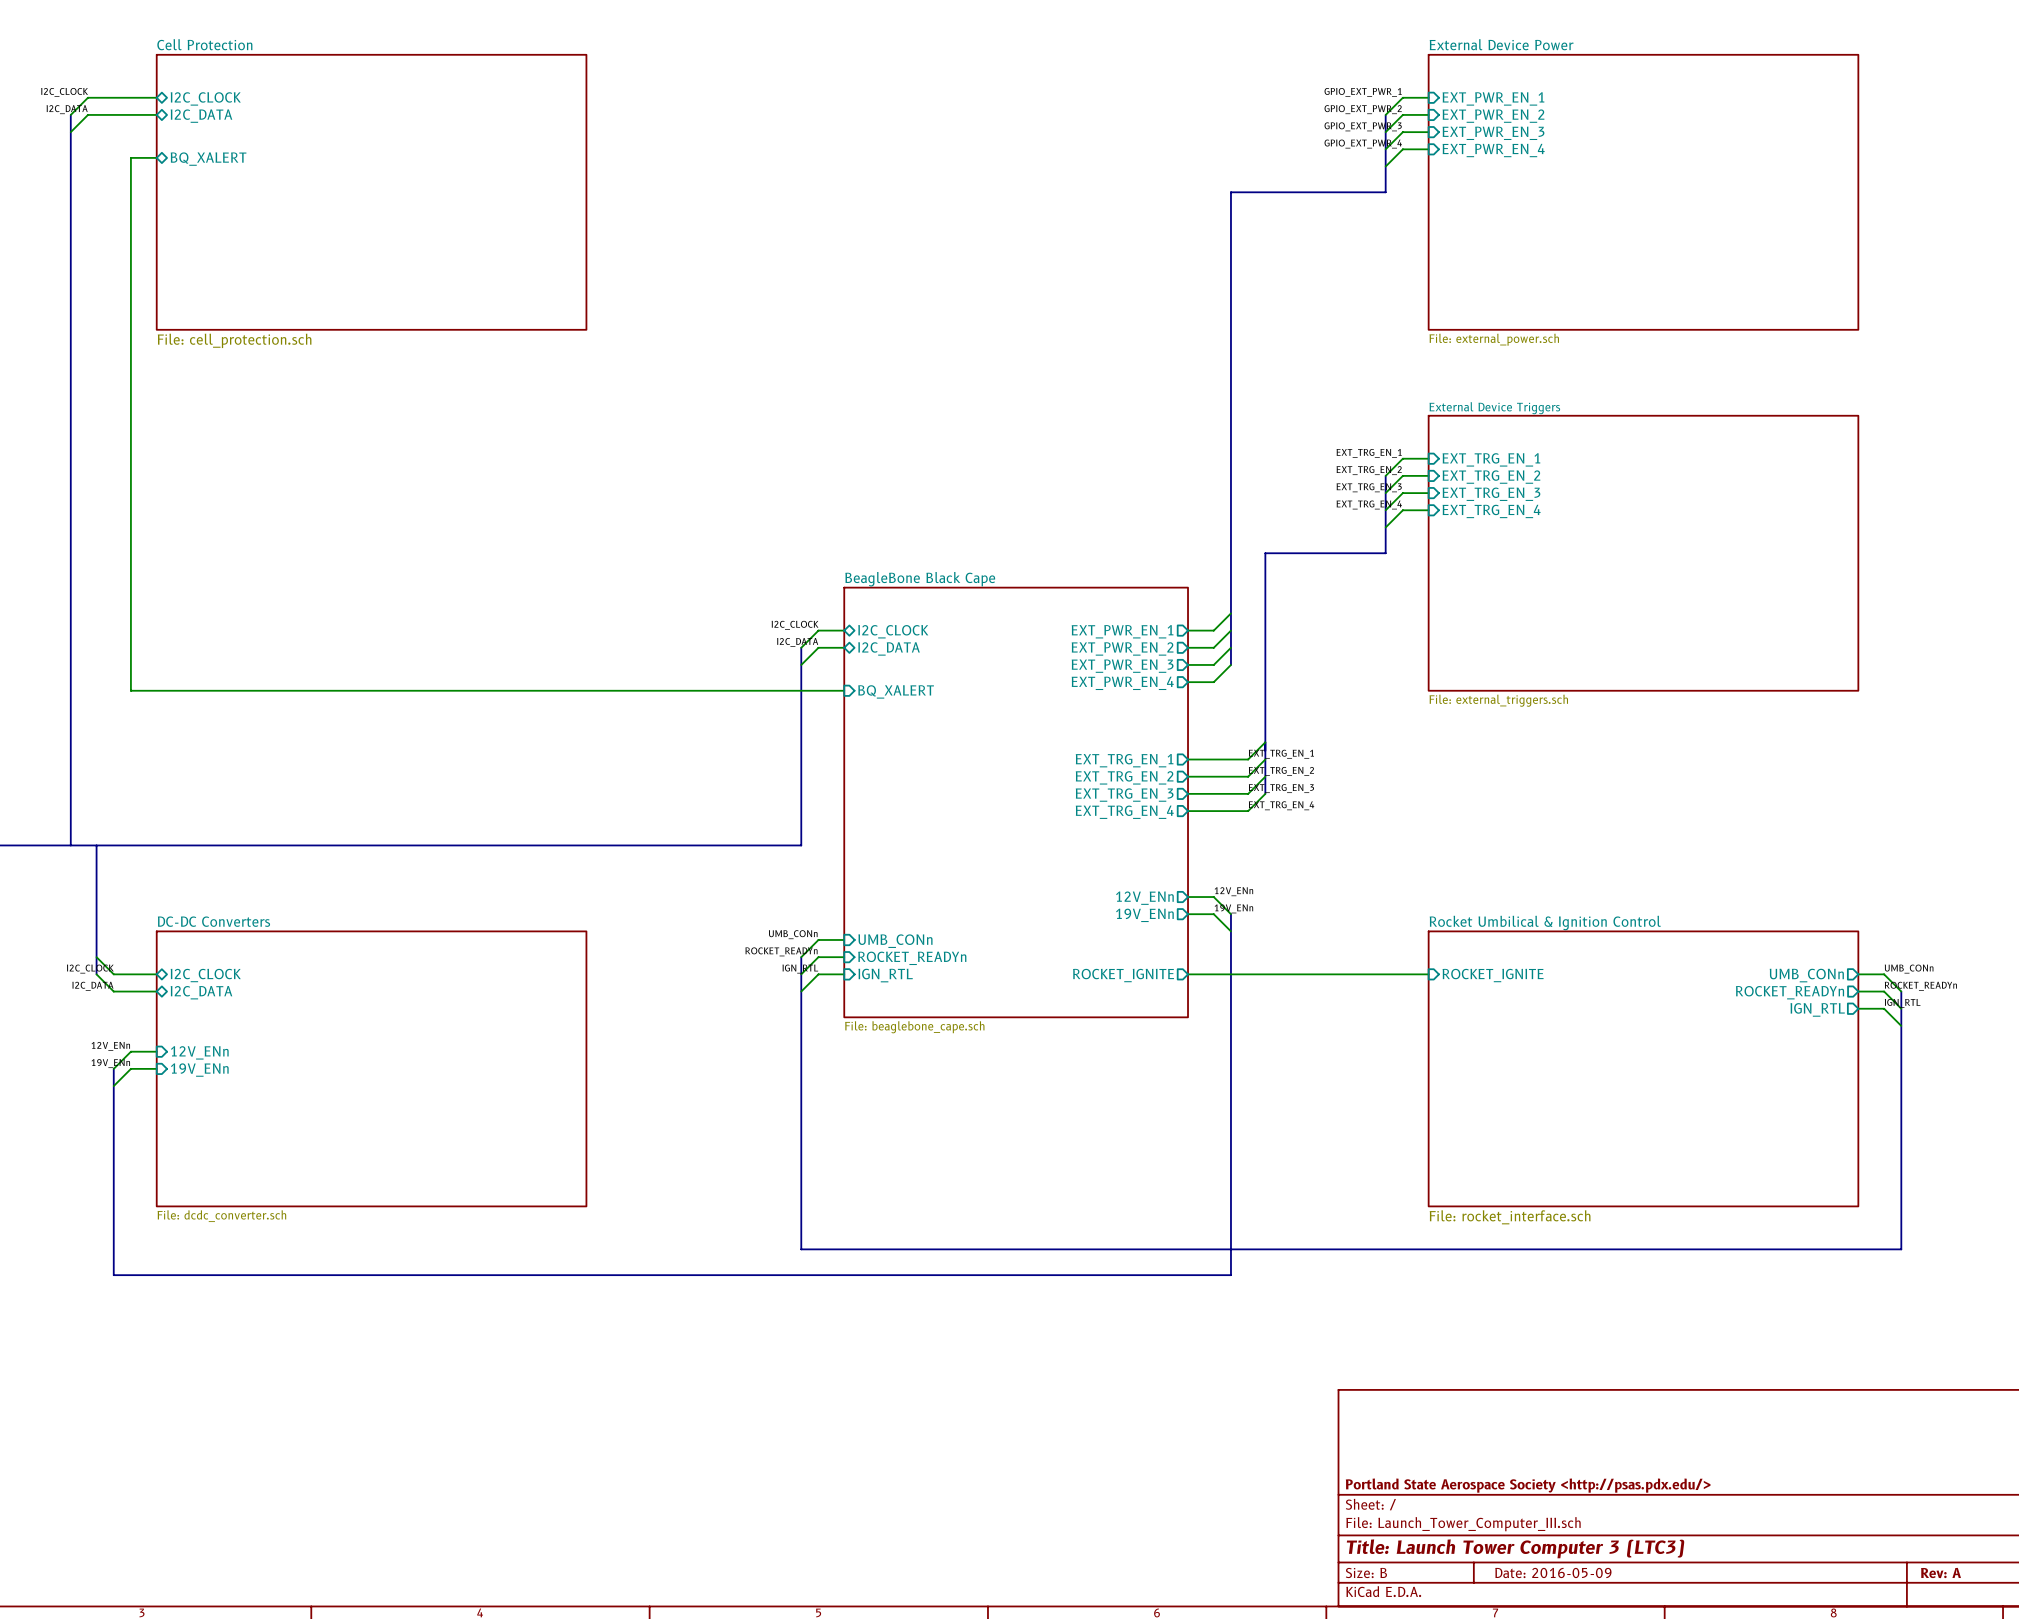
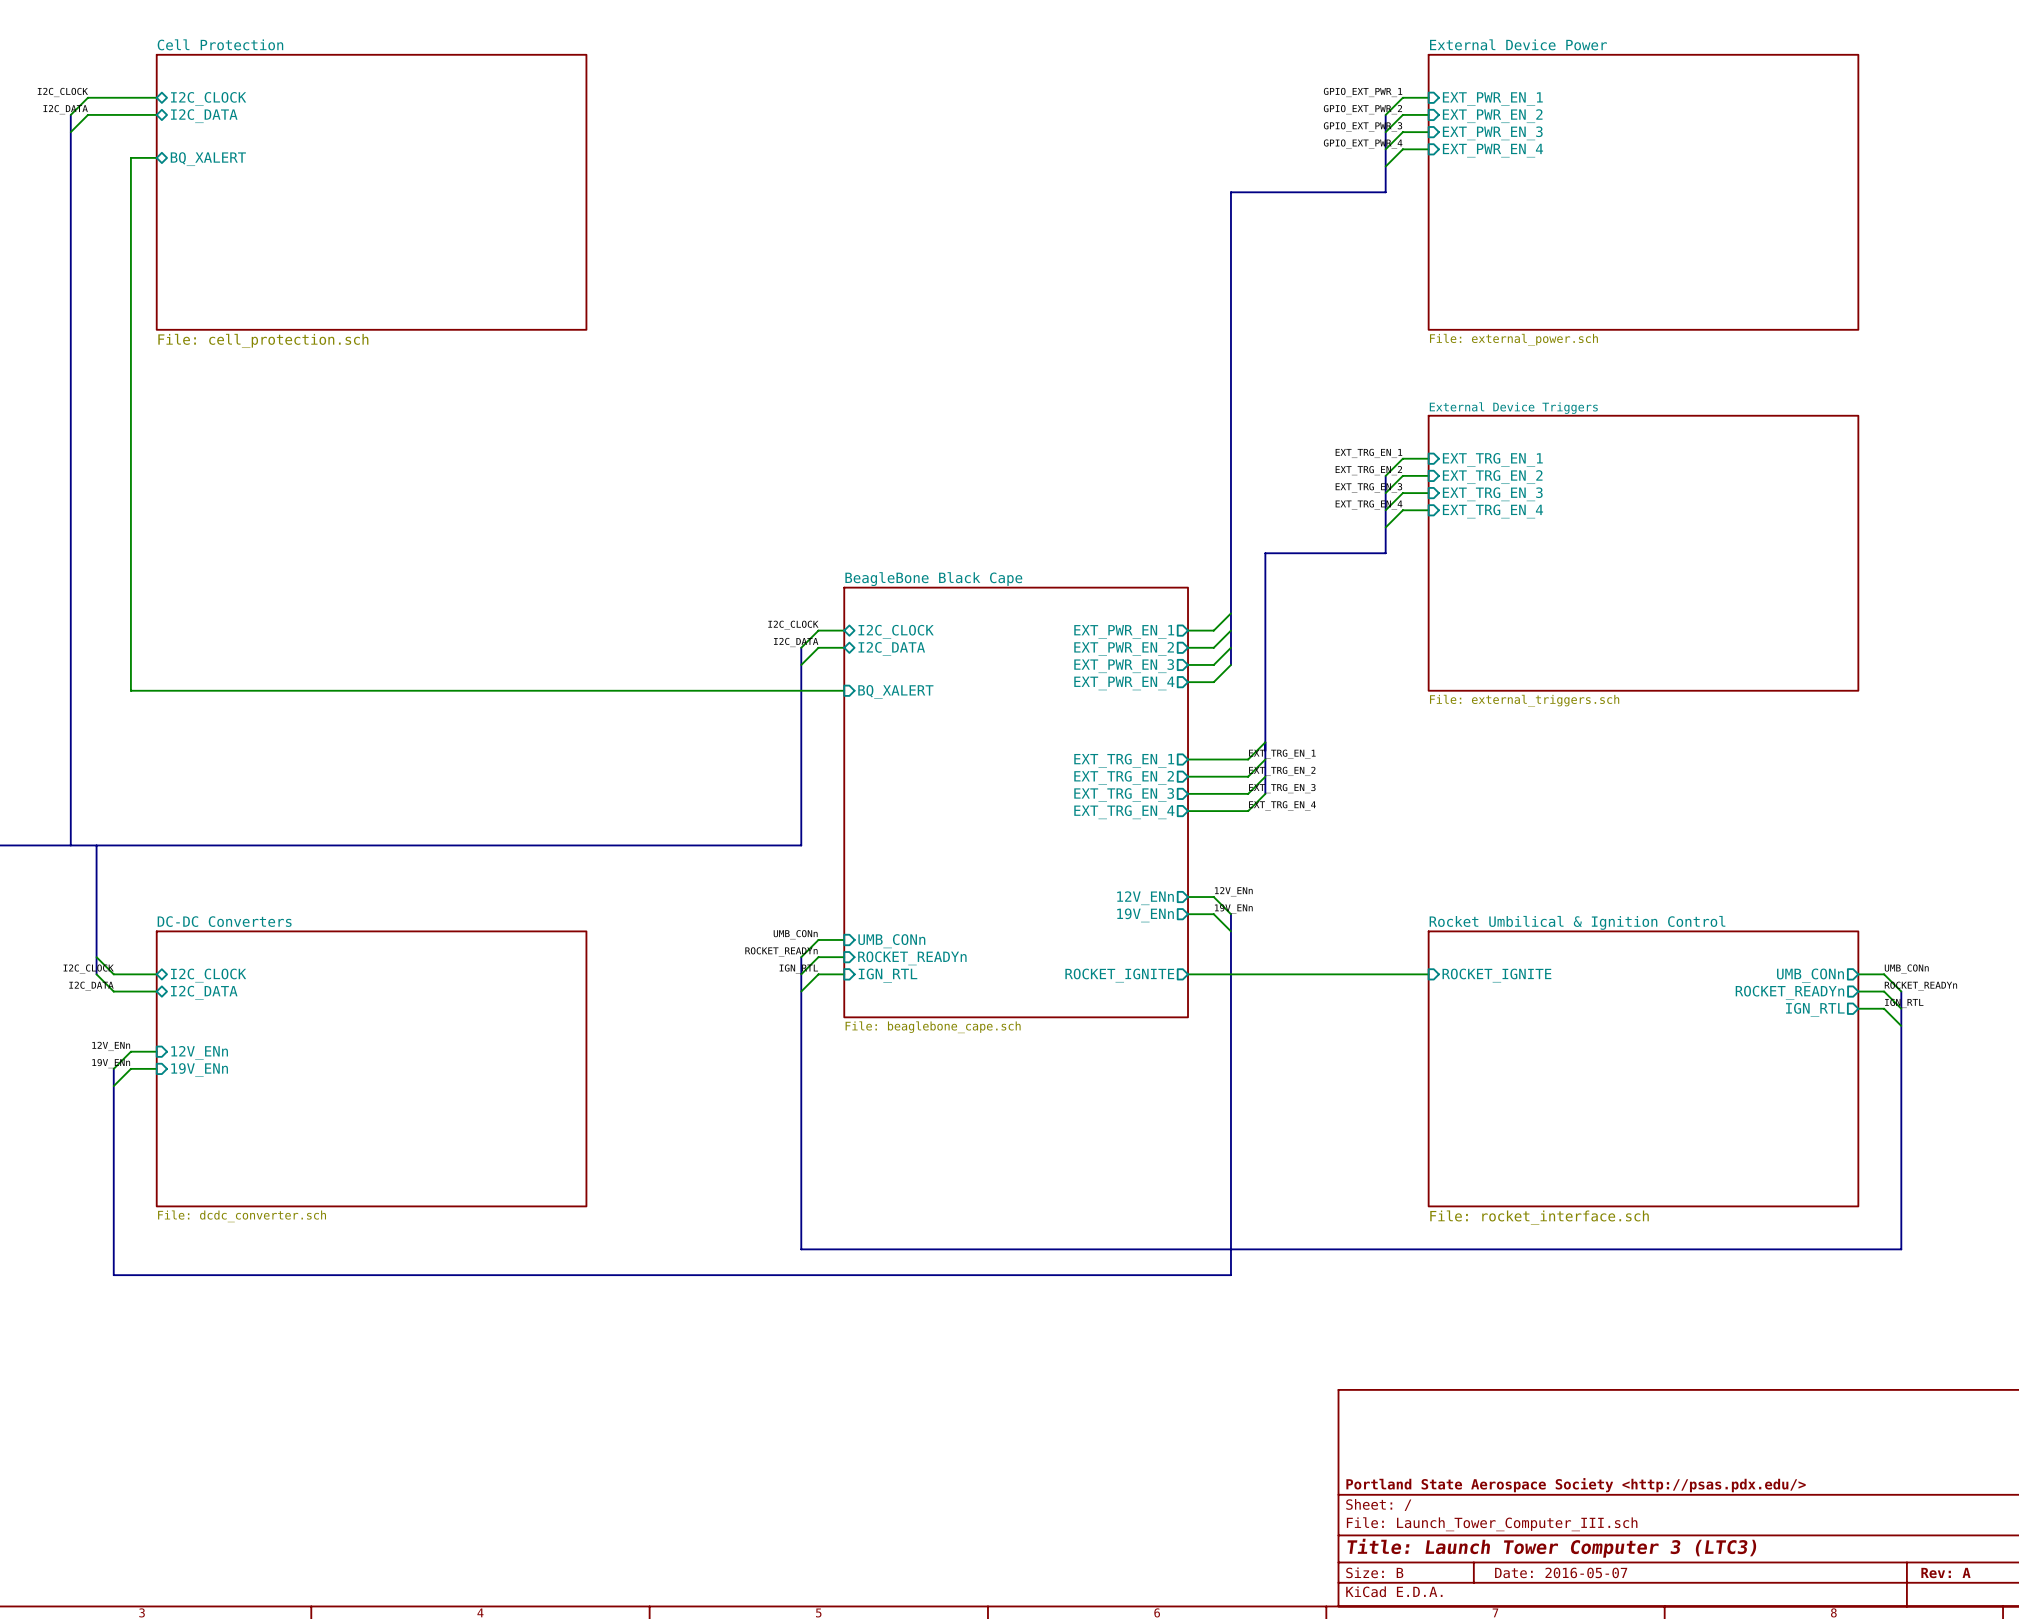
title block: Date: 2016-05-09 (1553, 1572) -> Date: 2016-05-07 (1561, 1572)

